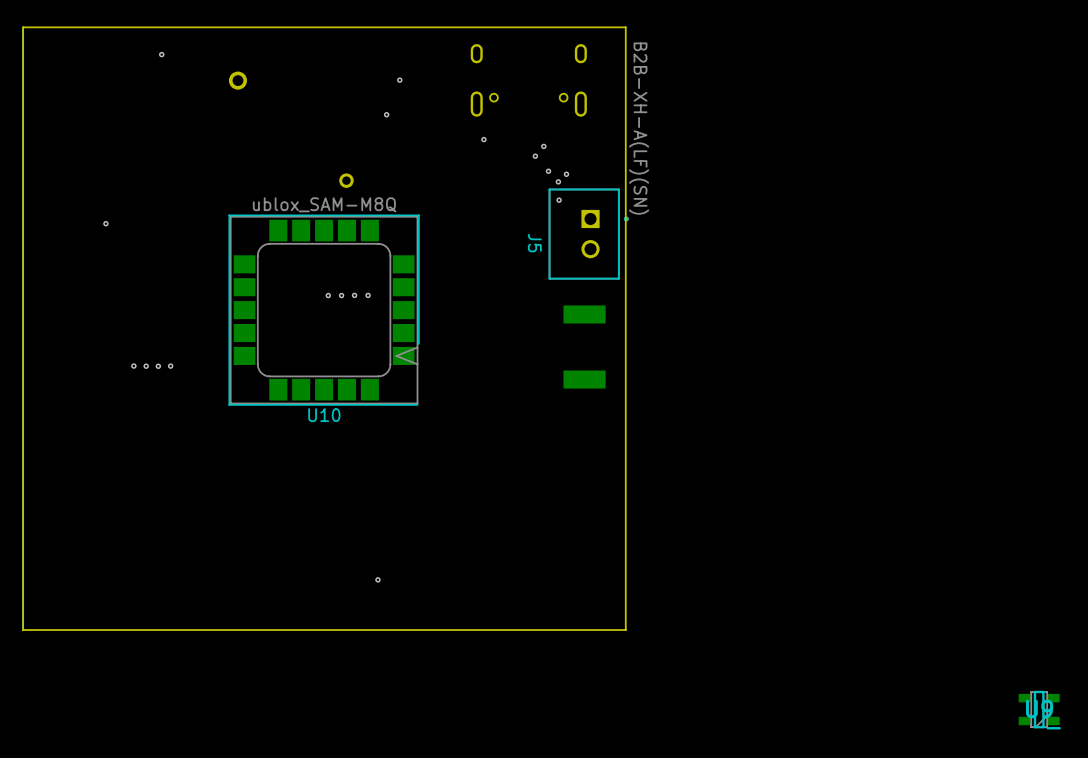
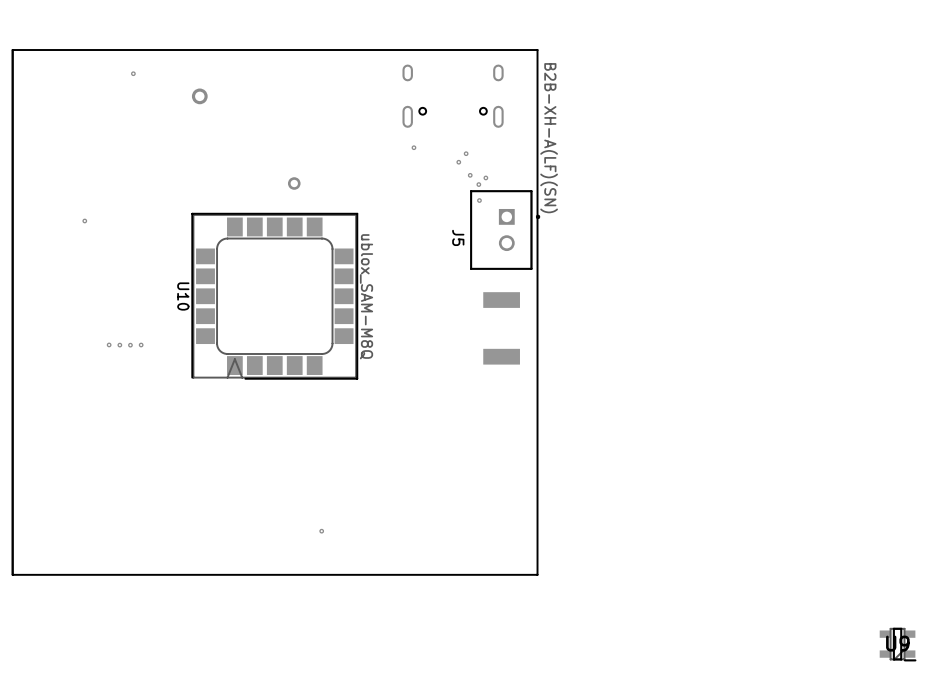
via: (399, 80) -> none
via: (386, 114) -> none
via: (328, 295) -> none
via: (341, 295) -> none
via: (354, 295) -> none
via: (368, 295) -> none
U10 rotation: 0° (324, 310) -> 90° clockwise (274, 296)

